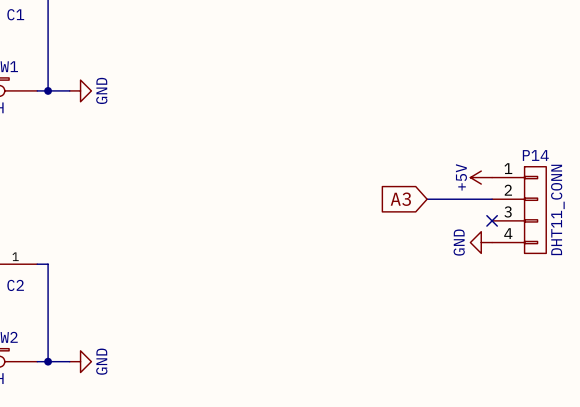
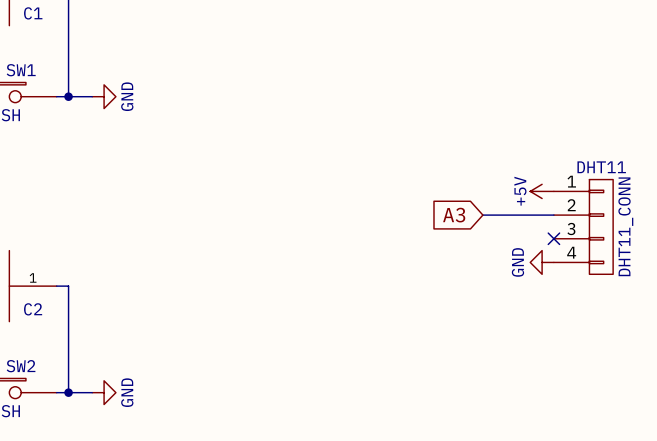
P14 name: P14 (535, 155) -> DHT11 (601, 167)

